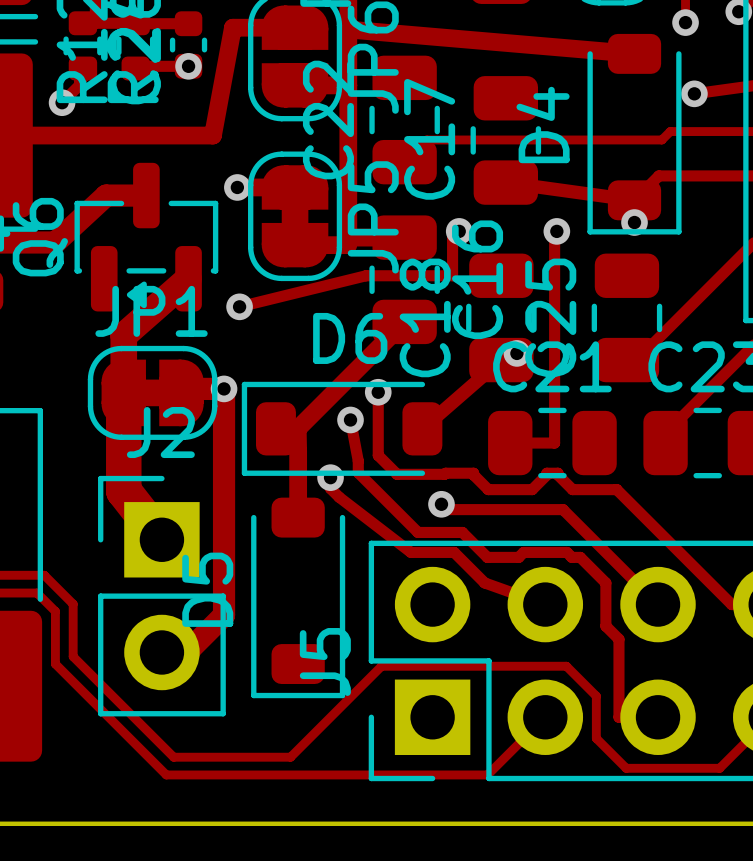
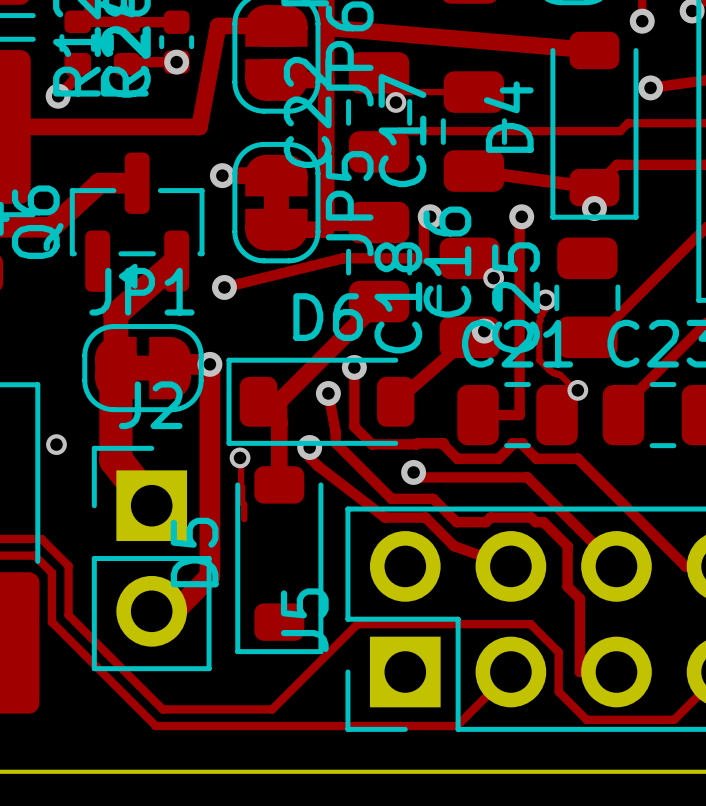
track: none -> (398, 92) (443, 92)
via: none -> (395, 102)
via: none -> (493, 278)
track: none -> (545, 299) (545, 309) (539, 321) (539, 360) (549, 370) (560, 374) (574, 389)
via: none -> (545, 299)
via: none -> (577, 390)
via: none -> (56, 444)
track: none -> (240, 457) (244, 519)
via: none -> (240, 457)

